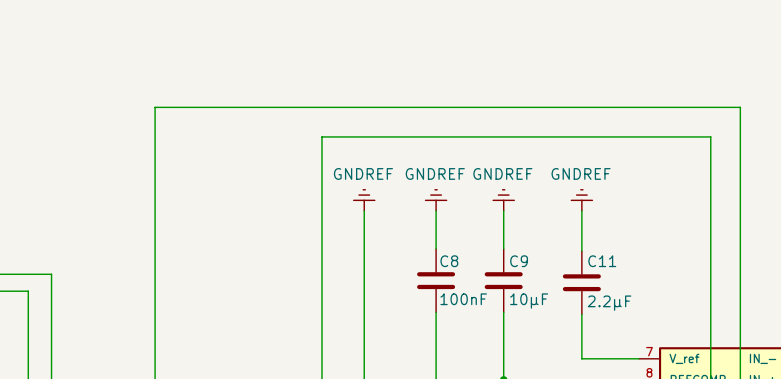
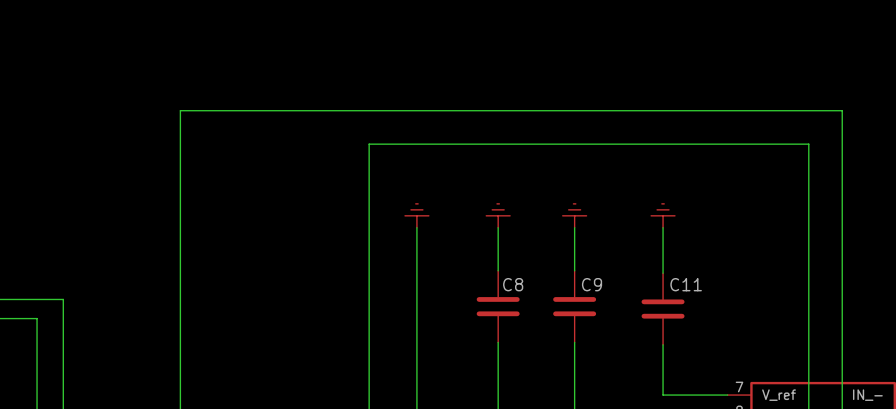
power symbol text: GNDREF (363, 173) -> none
power symbol text: GNDREF (435, 173) -> none
power symbol text: GNDREF (502, 173) -> none
power symbol text: GNDREF (581, 173) -> none
C8 value: 100nF (463, 299) -> none
C9 value: 10µF (529, 301) -> none
C11 value: 2.2µF (609, 303) -> none

